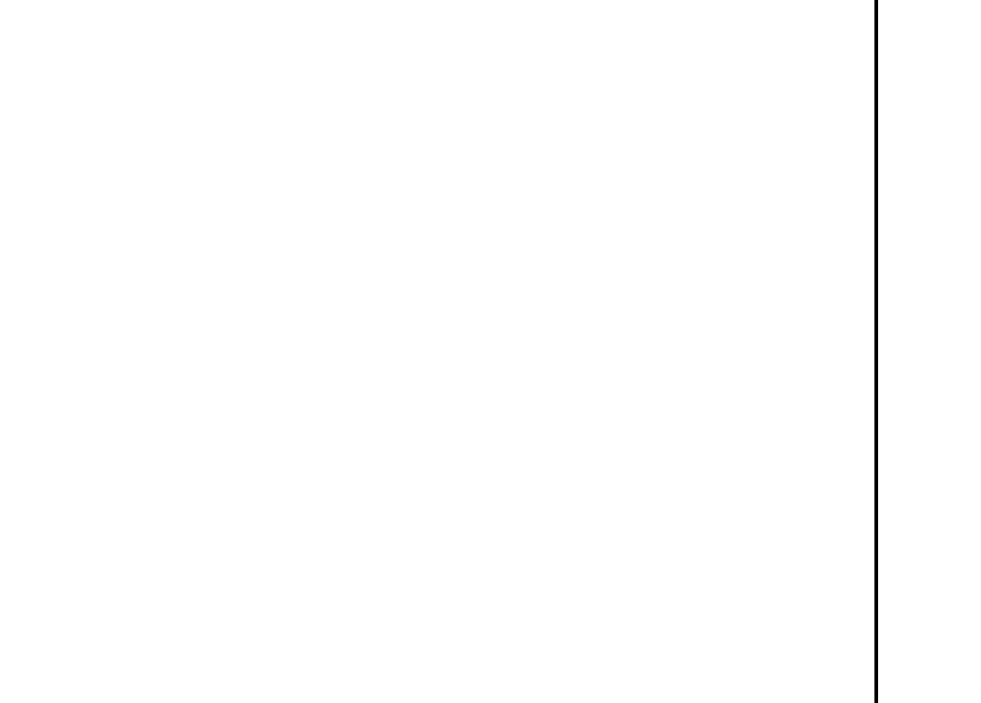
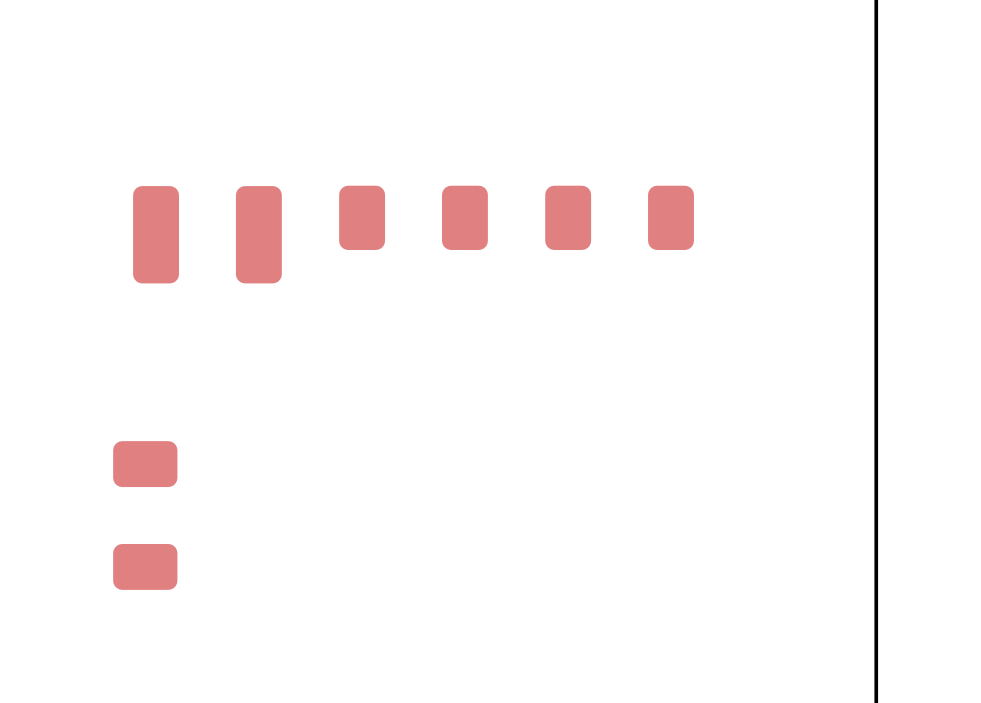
part: none -> (413, 217)
part: none -> (619, 217)
part: none -> (207, 234)
part: none -> (145, 515)

